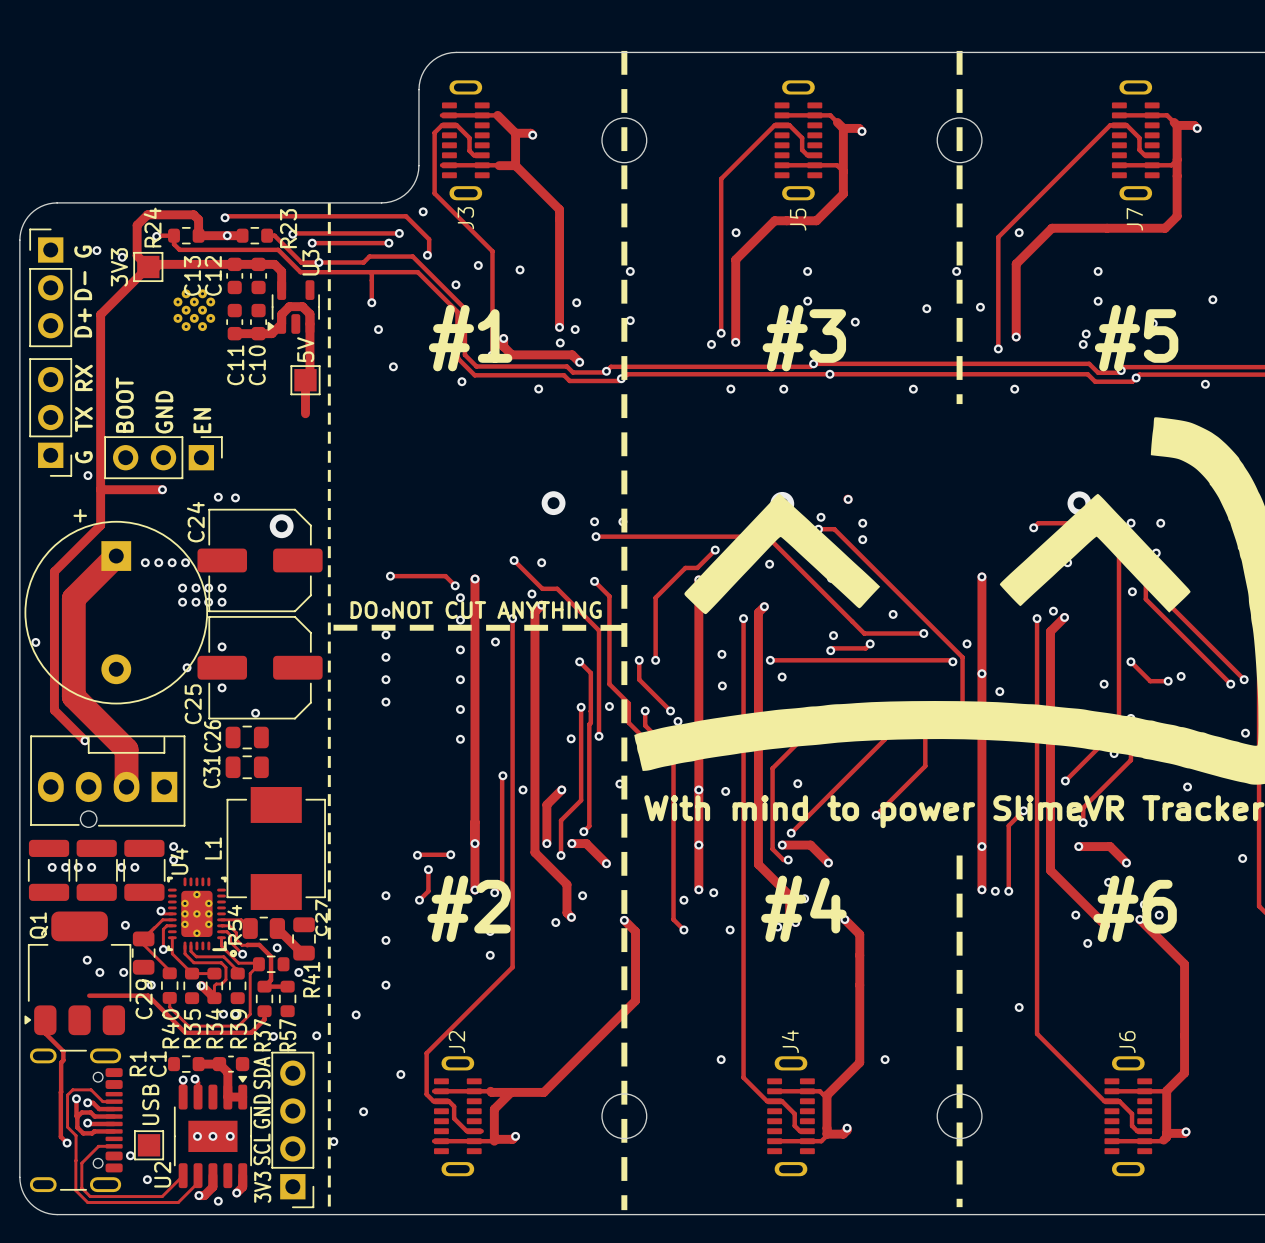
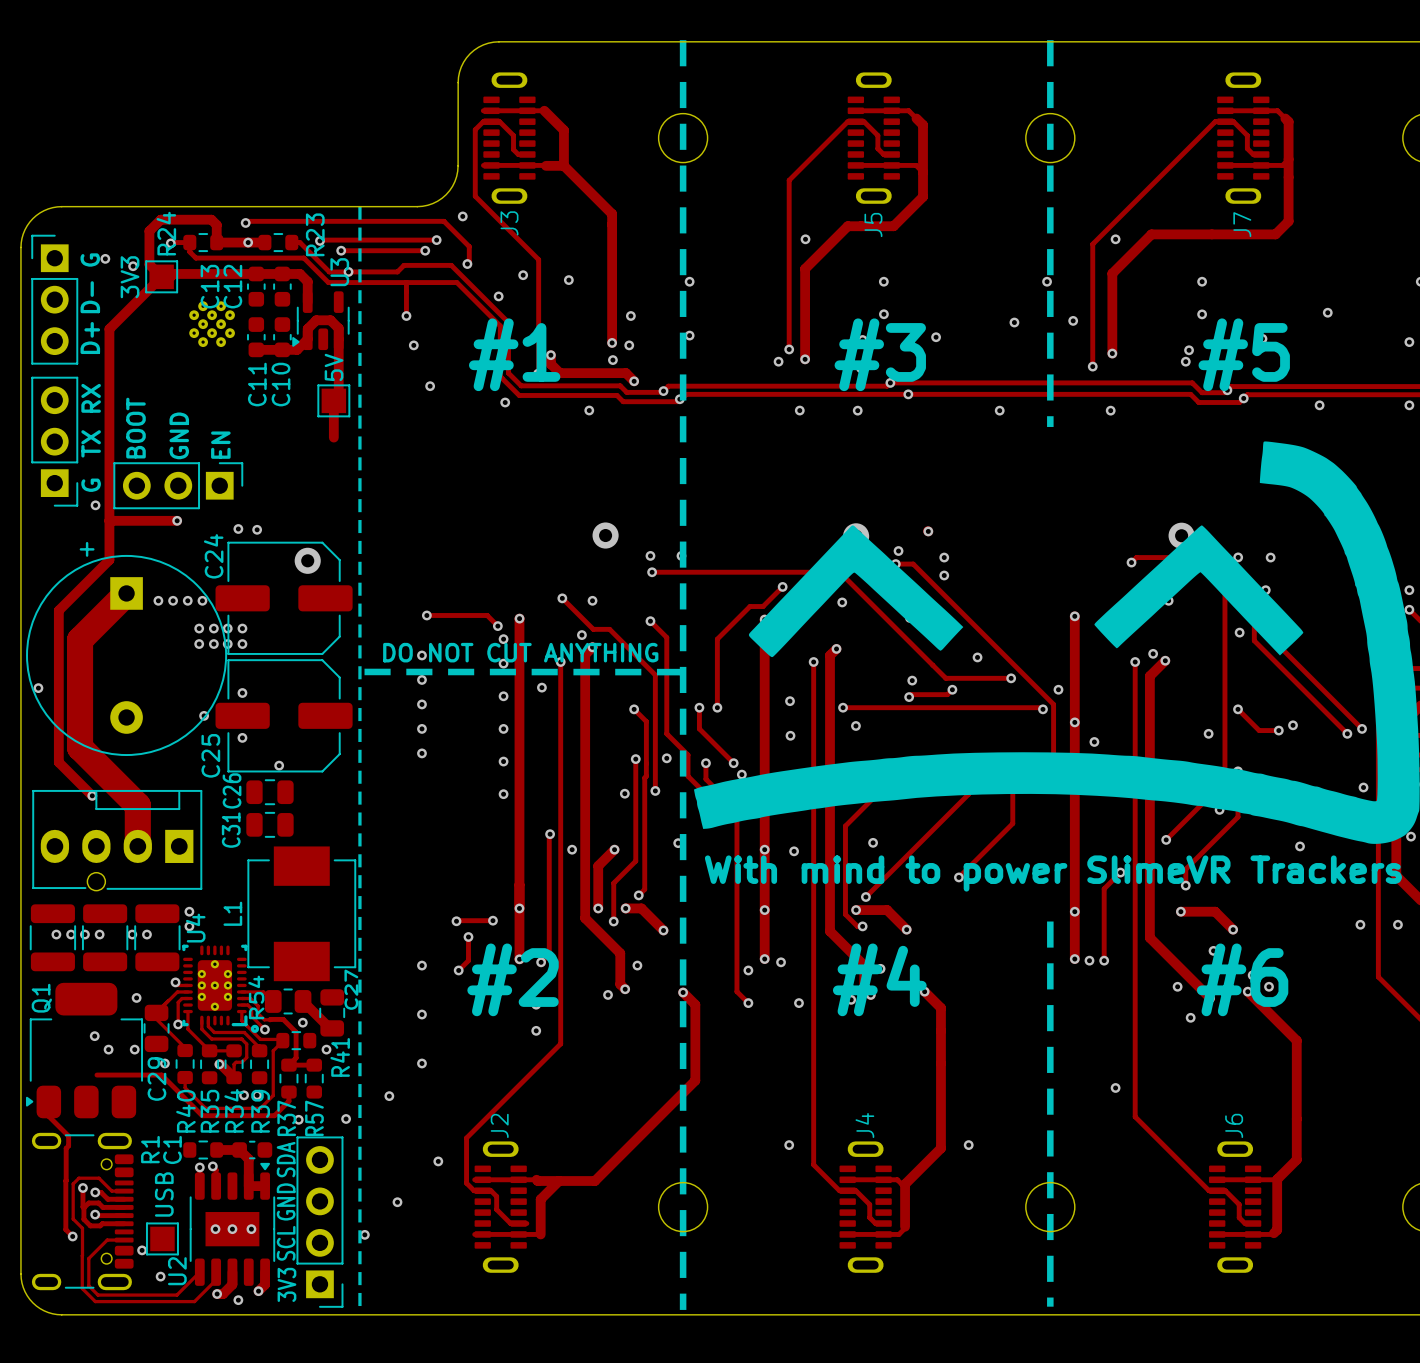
track: (1177, 125) (1194, 125) (1197, 128) -> none
track: (843, 128) (859, 128) (861, 131) -> none
via: (1197, 128) -> none
via: (861, 131) -> none
track: (515, 133) (530, 133) (532, 135) -> none
via: (532, 135) -> none
track: (847, 1128) (843, 1134) (826, 1134) -> none
via: (847, 1128) -> none
track: (1186, 1131) (1166, 1133) -> none
via: (1186, 1131) -> none
track: (515, 1136) (512, 1139) (494, 1139) -> none
via: (515, 1136) -> none

